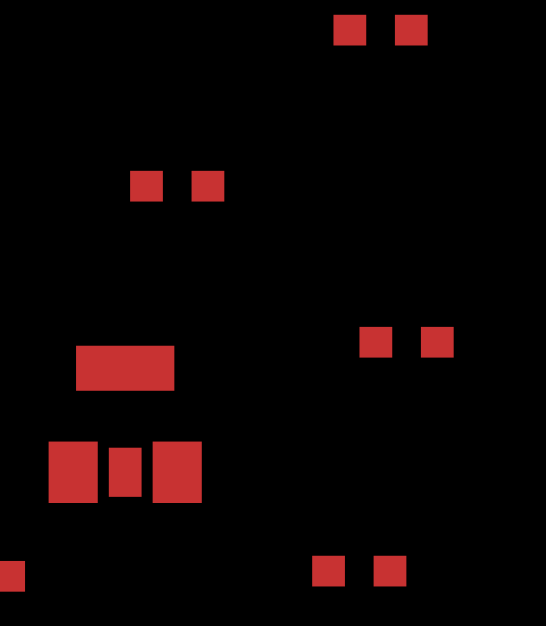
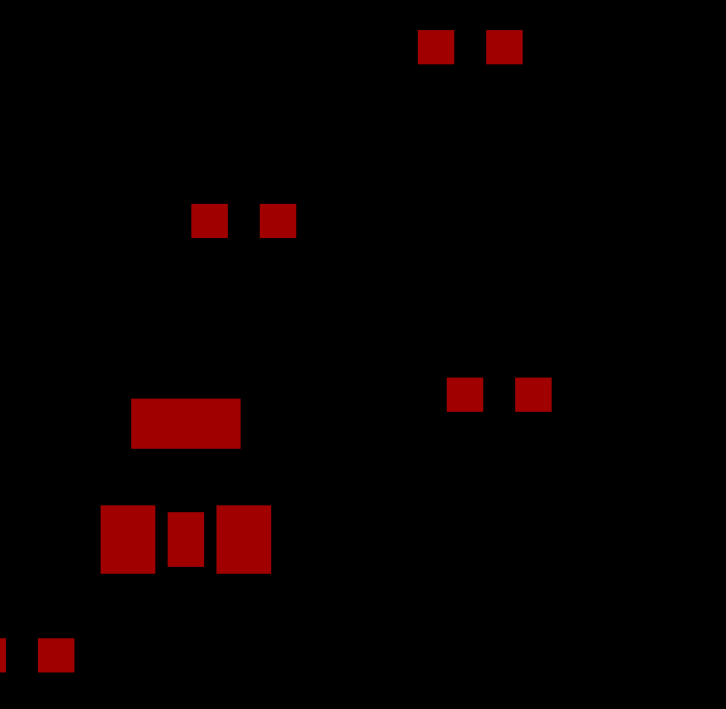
part: (359, 571) -> none

